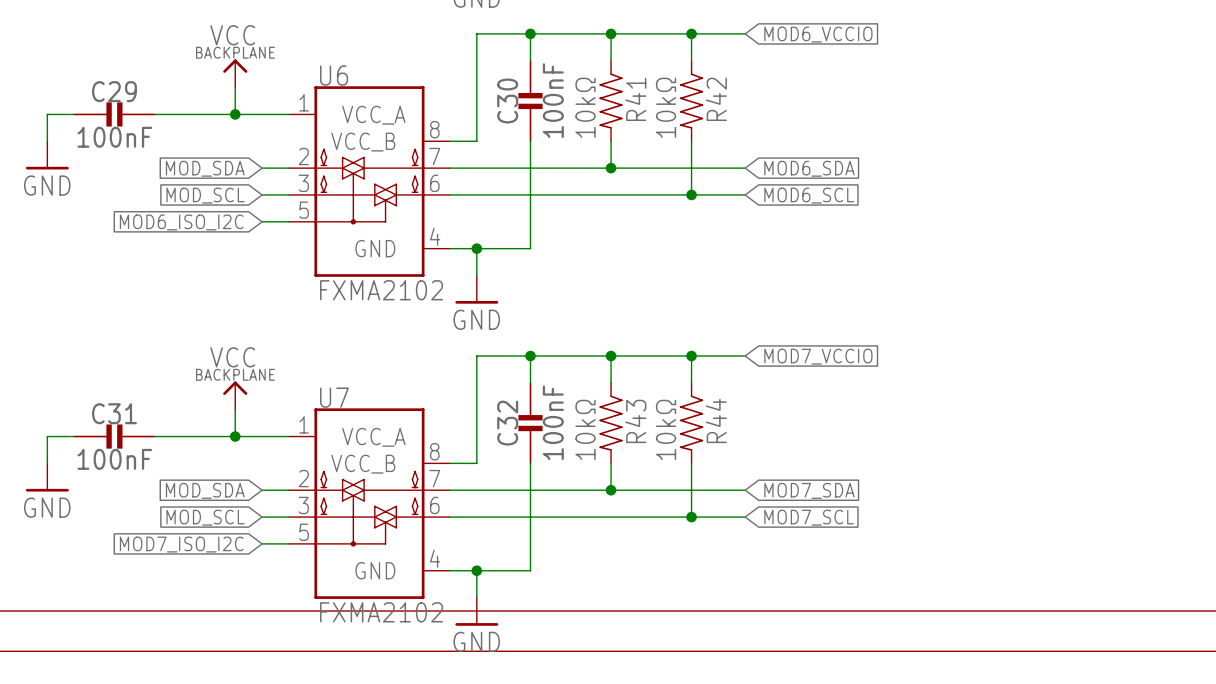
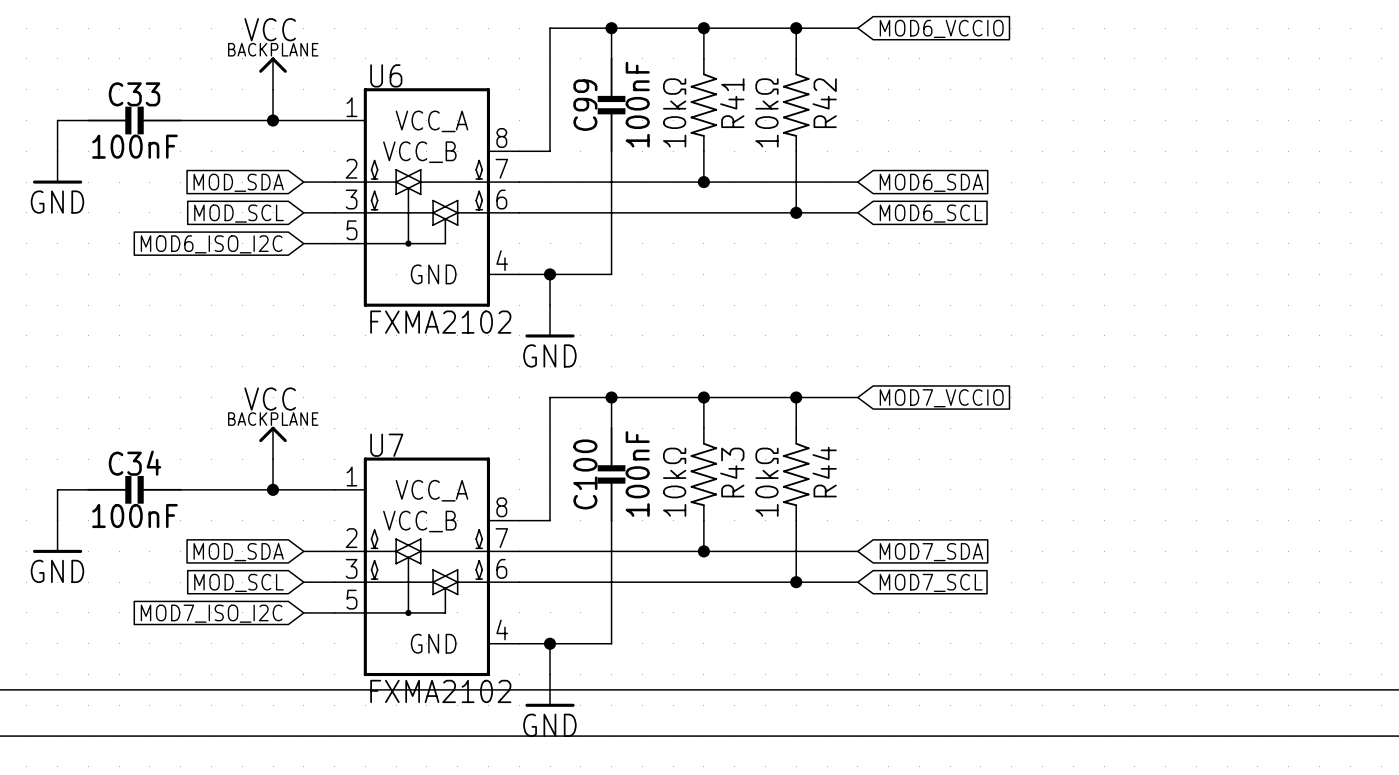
C29 name: C29 (114, 91) -> C33 (134, 94)
C30 name: C30 (507, 101) -> C99 (585, 105)
C31 name: C31 (114, 413) -> C34 (134, 463)
C32 name: C32 (507, 423) -> C100 (585, 474)

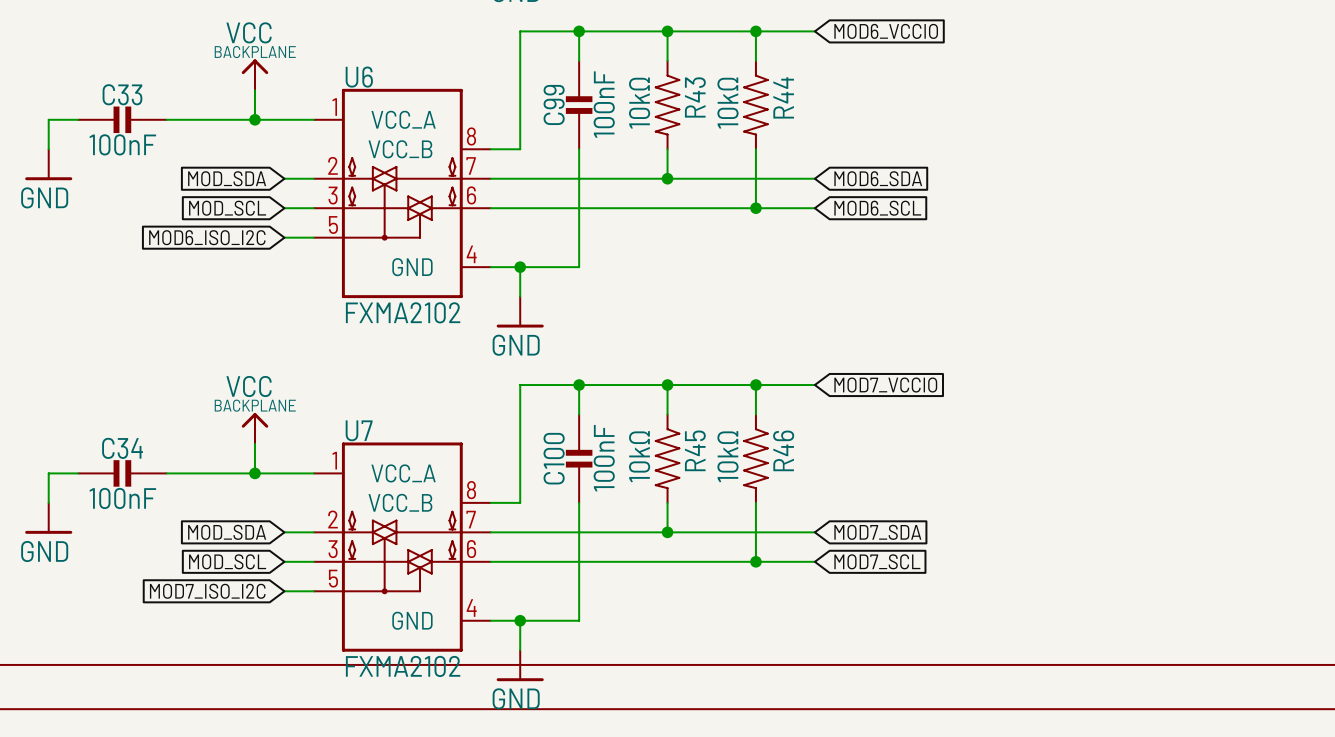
R41 name: R41 (732, 103) -> R43 (695, 97)
R42 name: R42 (824, 103) -> R44 (783, 97)
R43 name: R43 (732, 472) -> R45 (695, 450)
R44 name: R44 (824, 472) -> R46 (783, 450)

